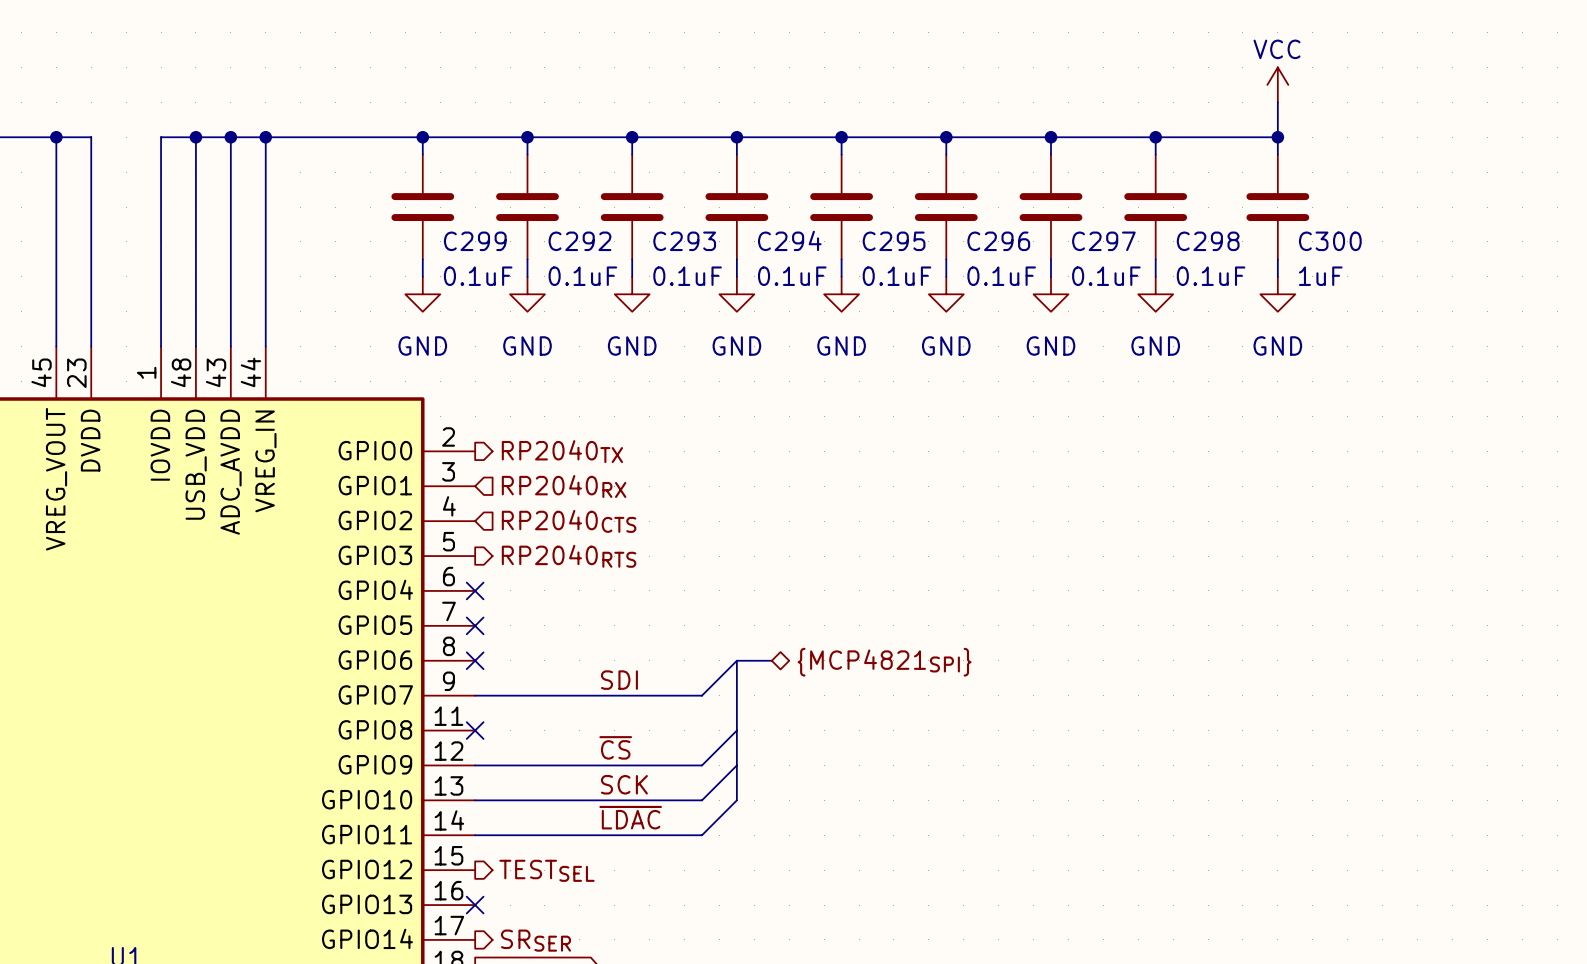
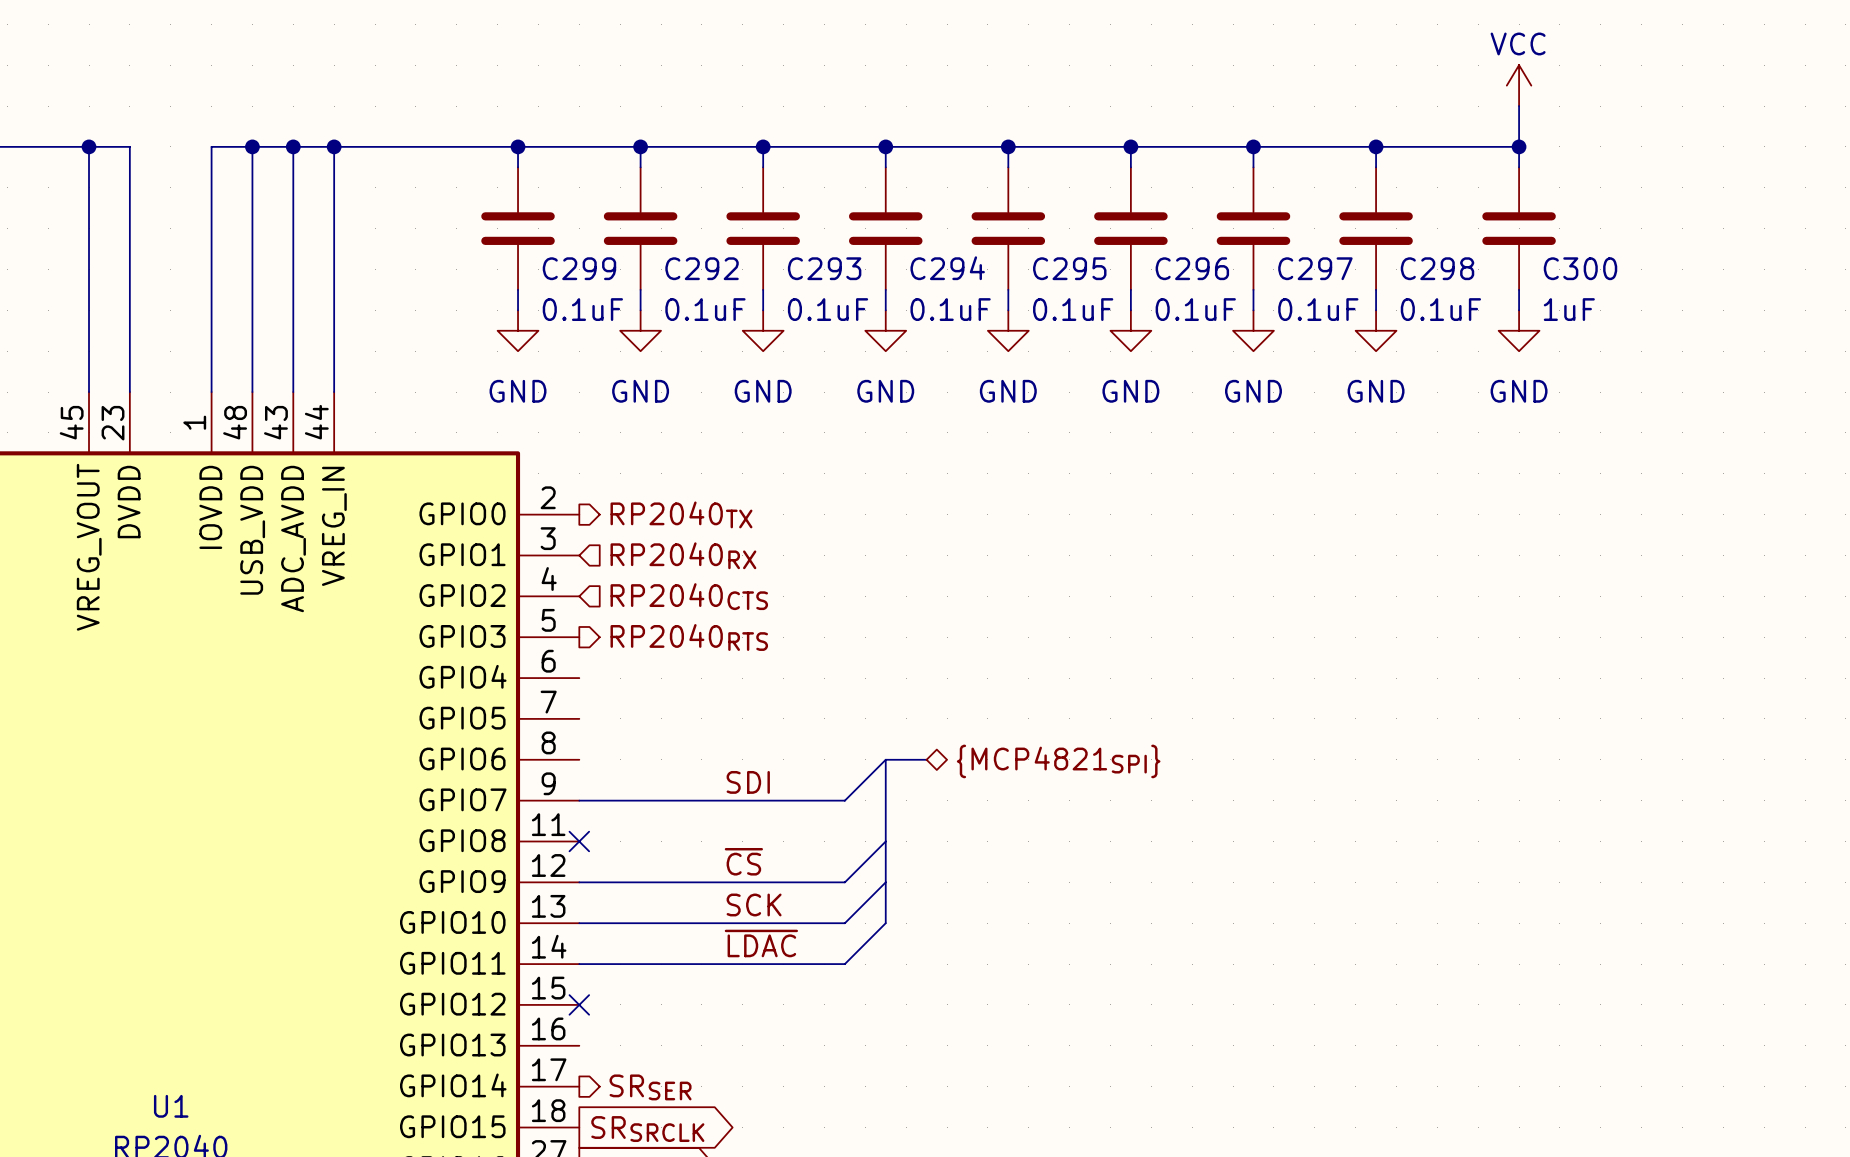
no-connect mark: (475, 590) -> none
no-connect mark: (475, 625) -> none
no-connect mark: (475, 660) -> none
hierarchical label: TESTSEL (546, 870) -> none
no-connect mark position: (475, 905) -> (579, 1004)

